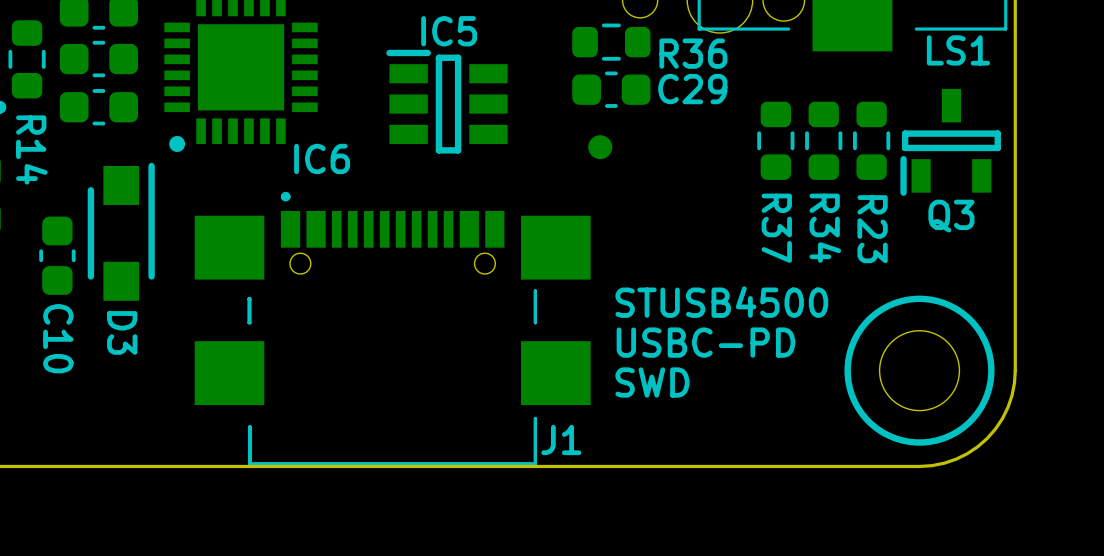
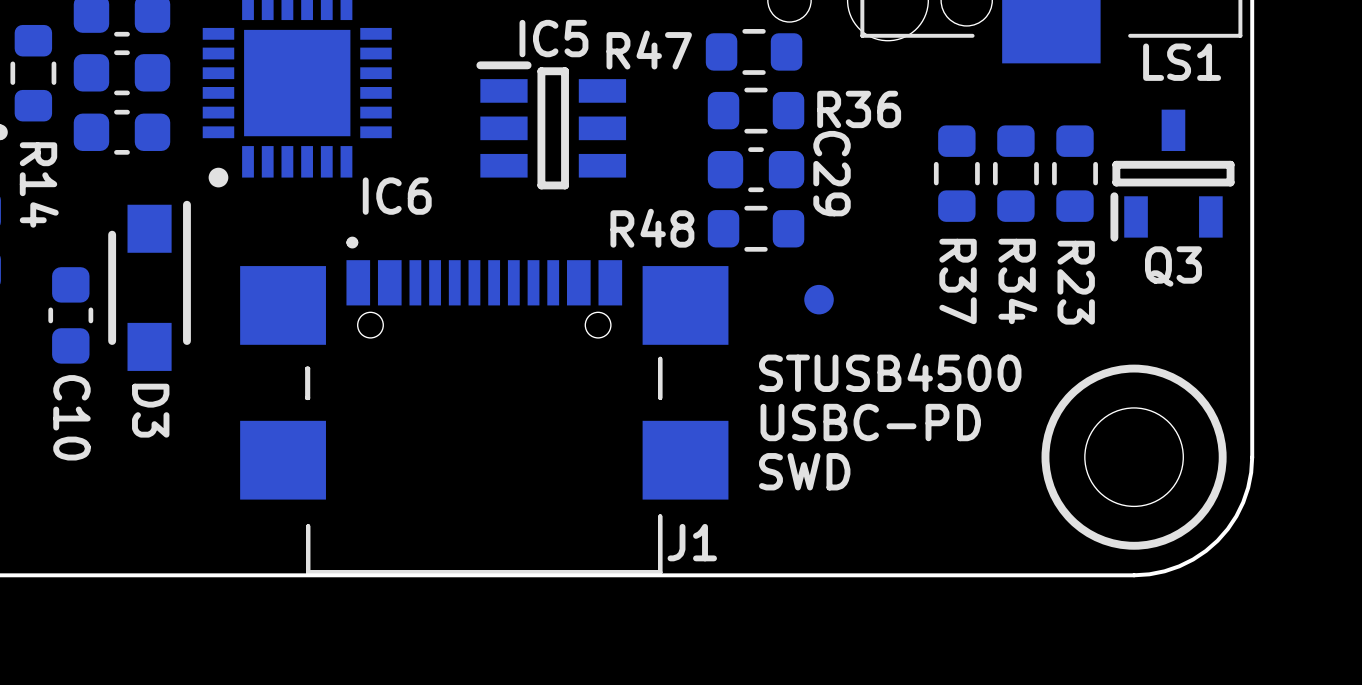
R36 name: R36 (693, 53) -> R47 (649, 50)
C29 position: (611, 89) -> (756, 169)
R36: none -> (756, 110)
C29 name rotation: 0° (692, 89) -> 90° clockwise (832, 173)
part position: (600, 147) -> (819, 299)
R48: none -> (756, 228)

